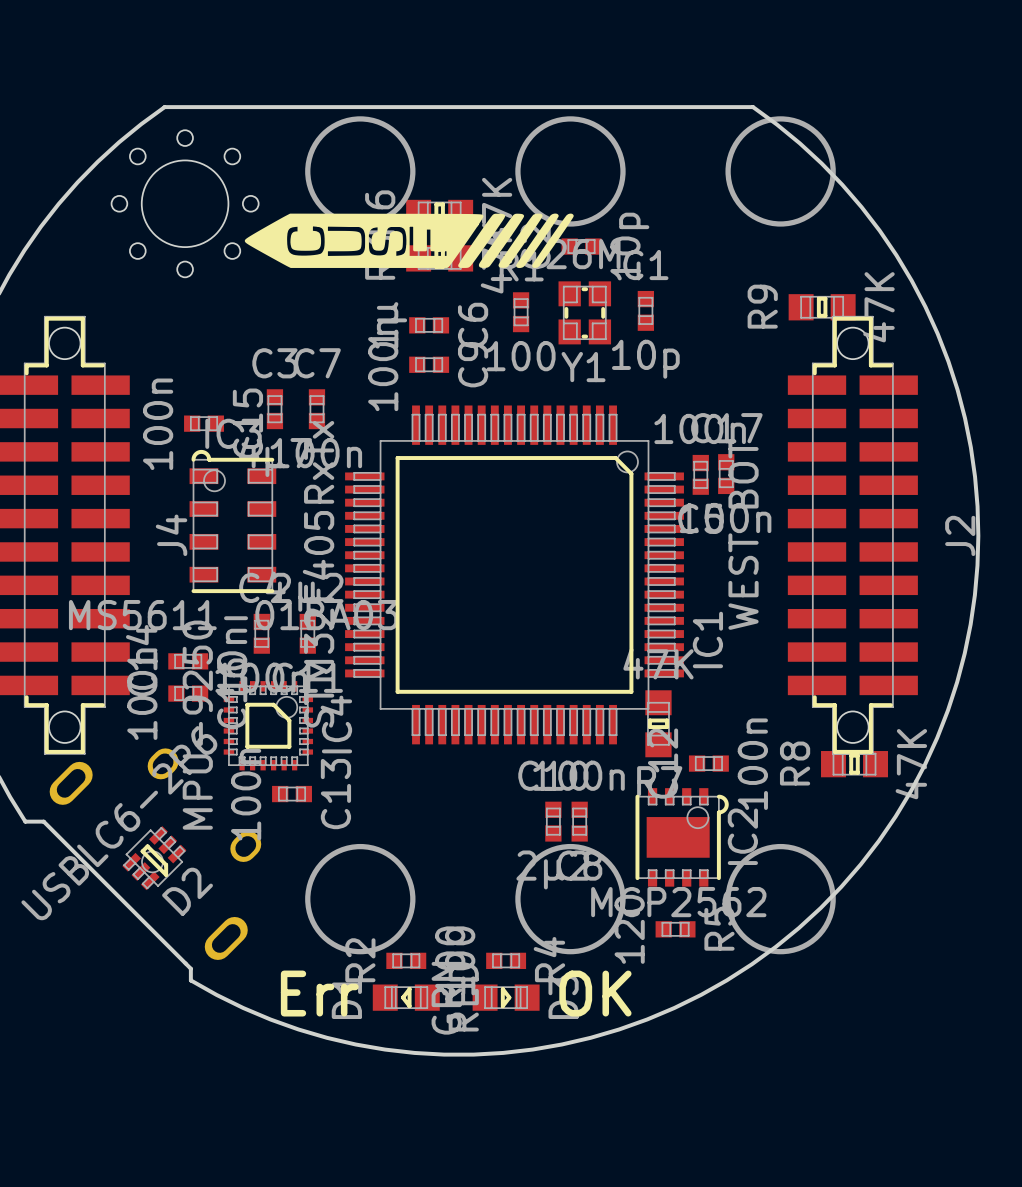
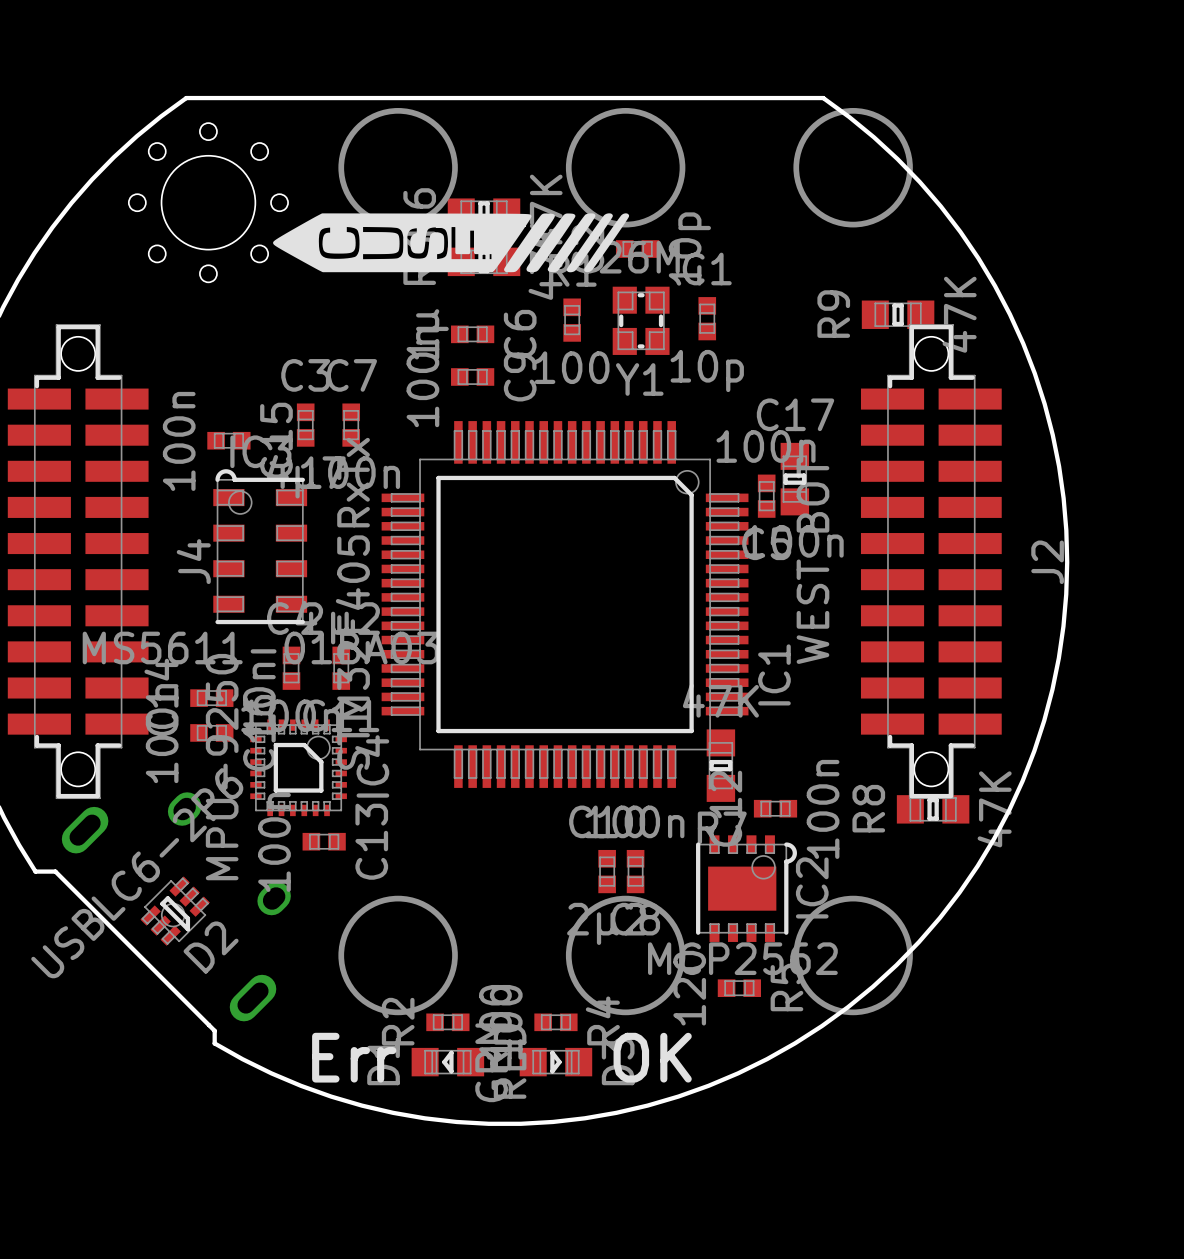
C17 footprint: [718, 454, 735, 495] -> [780, 442, 810, 516]

